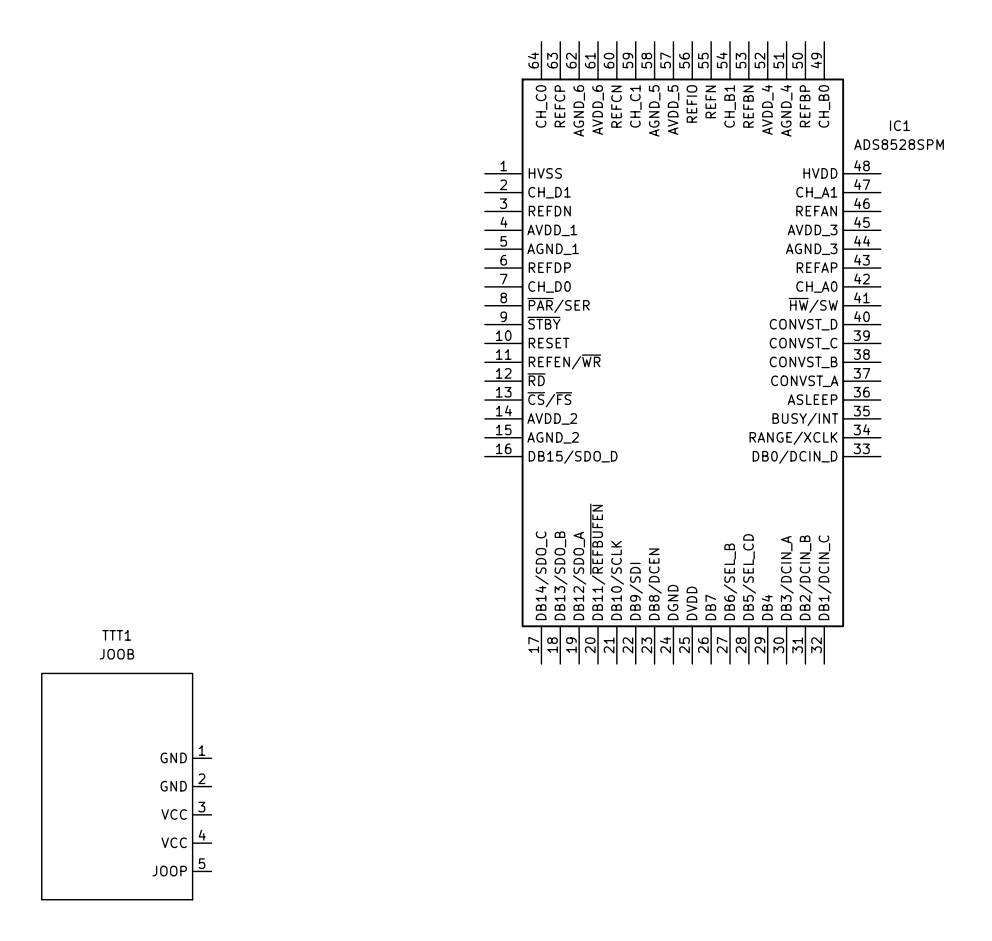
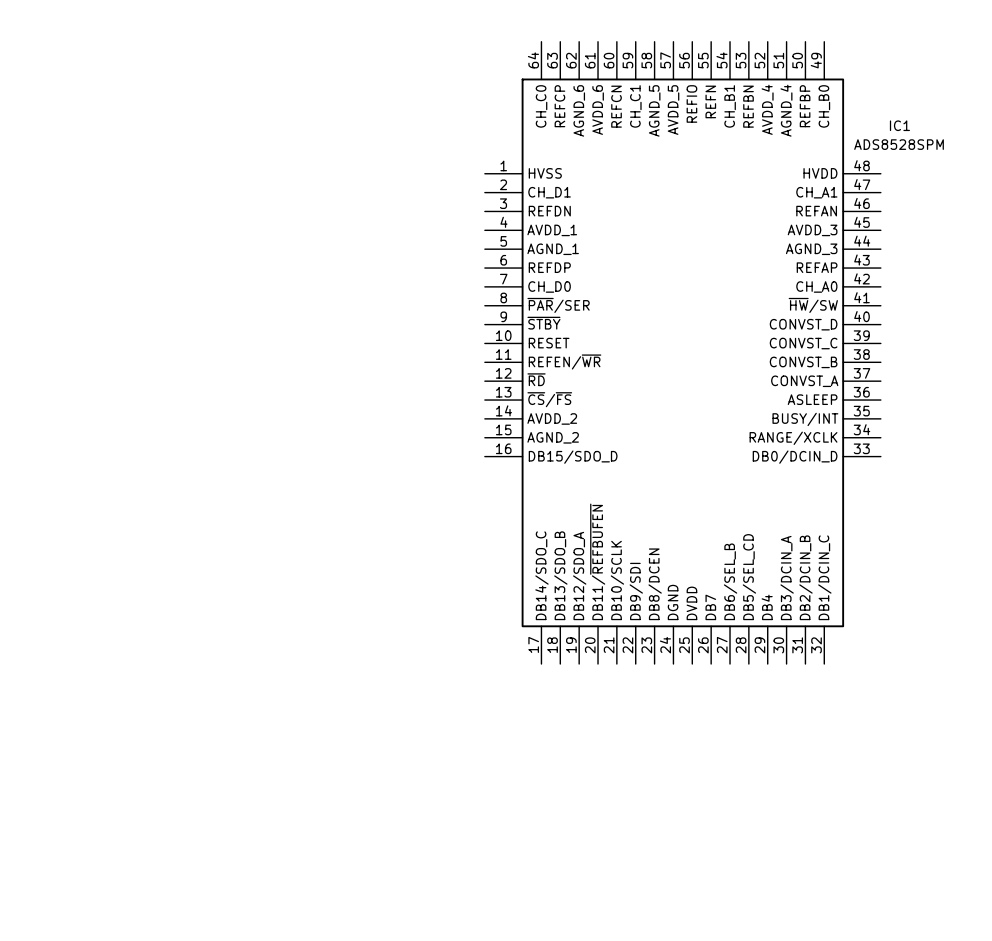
TTT1: JOOB (126, 786) -> none

